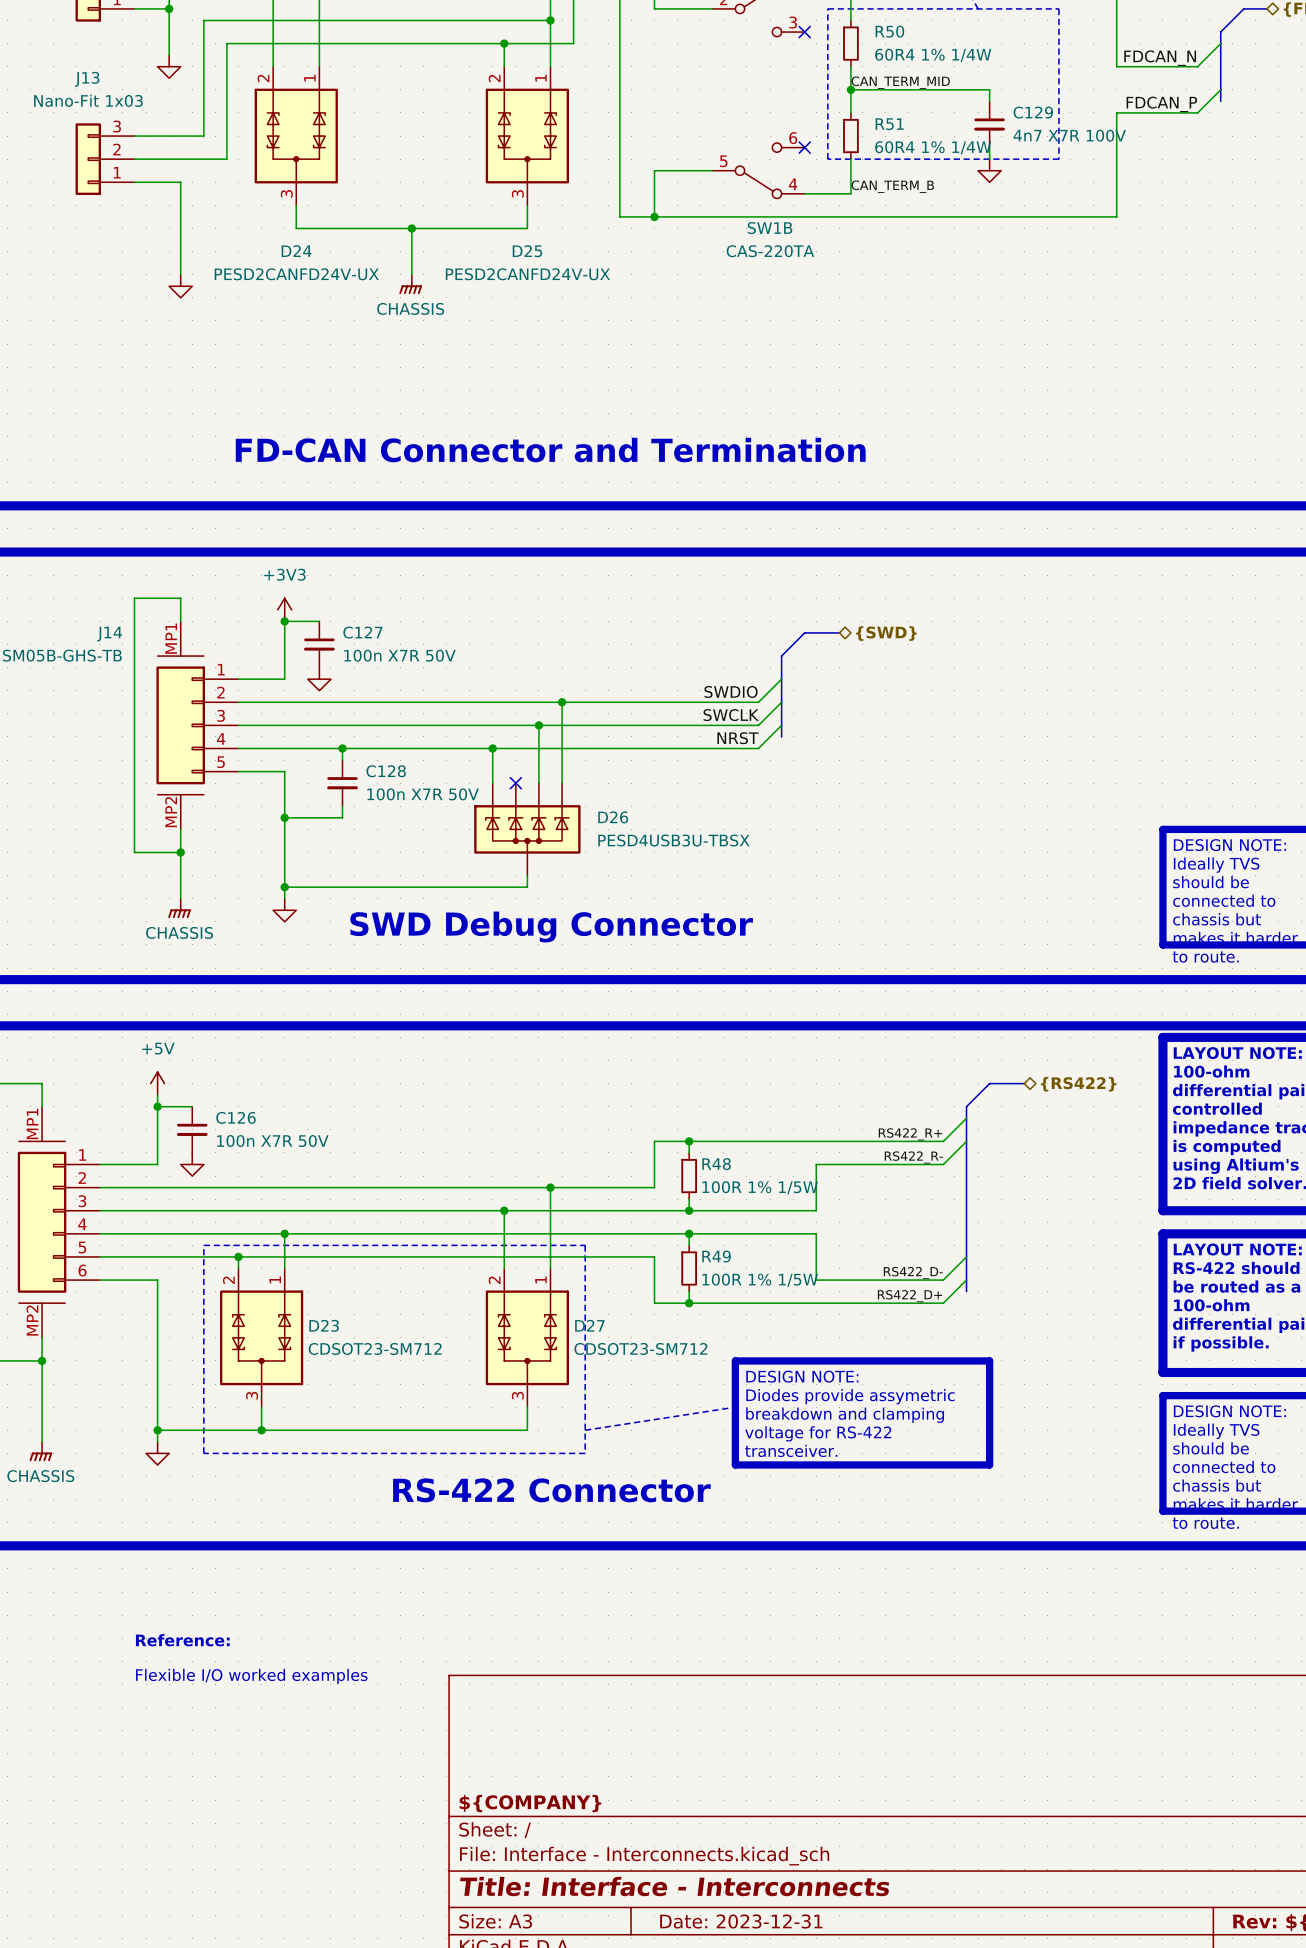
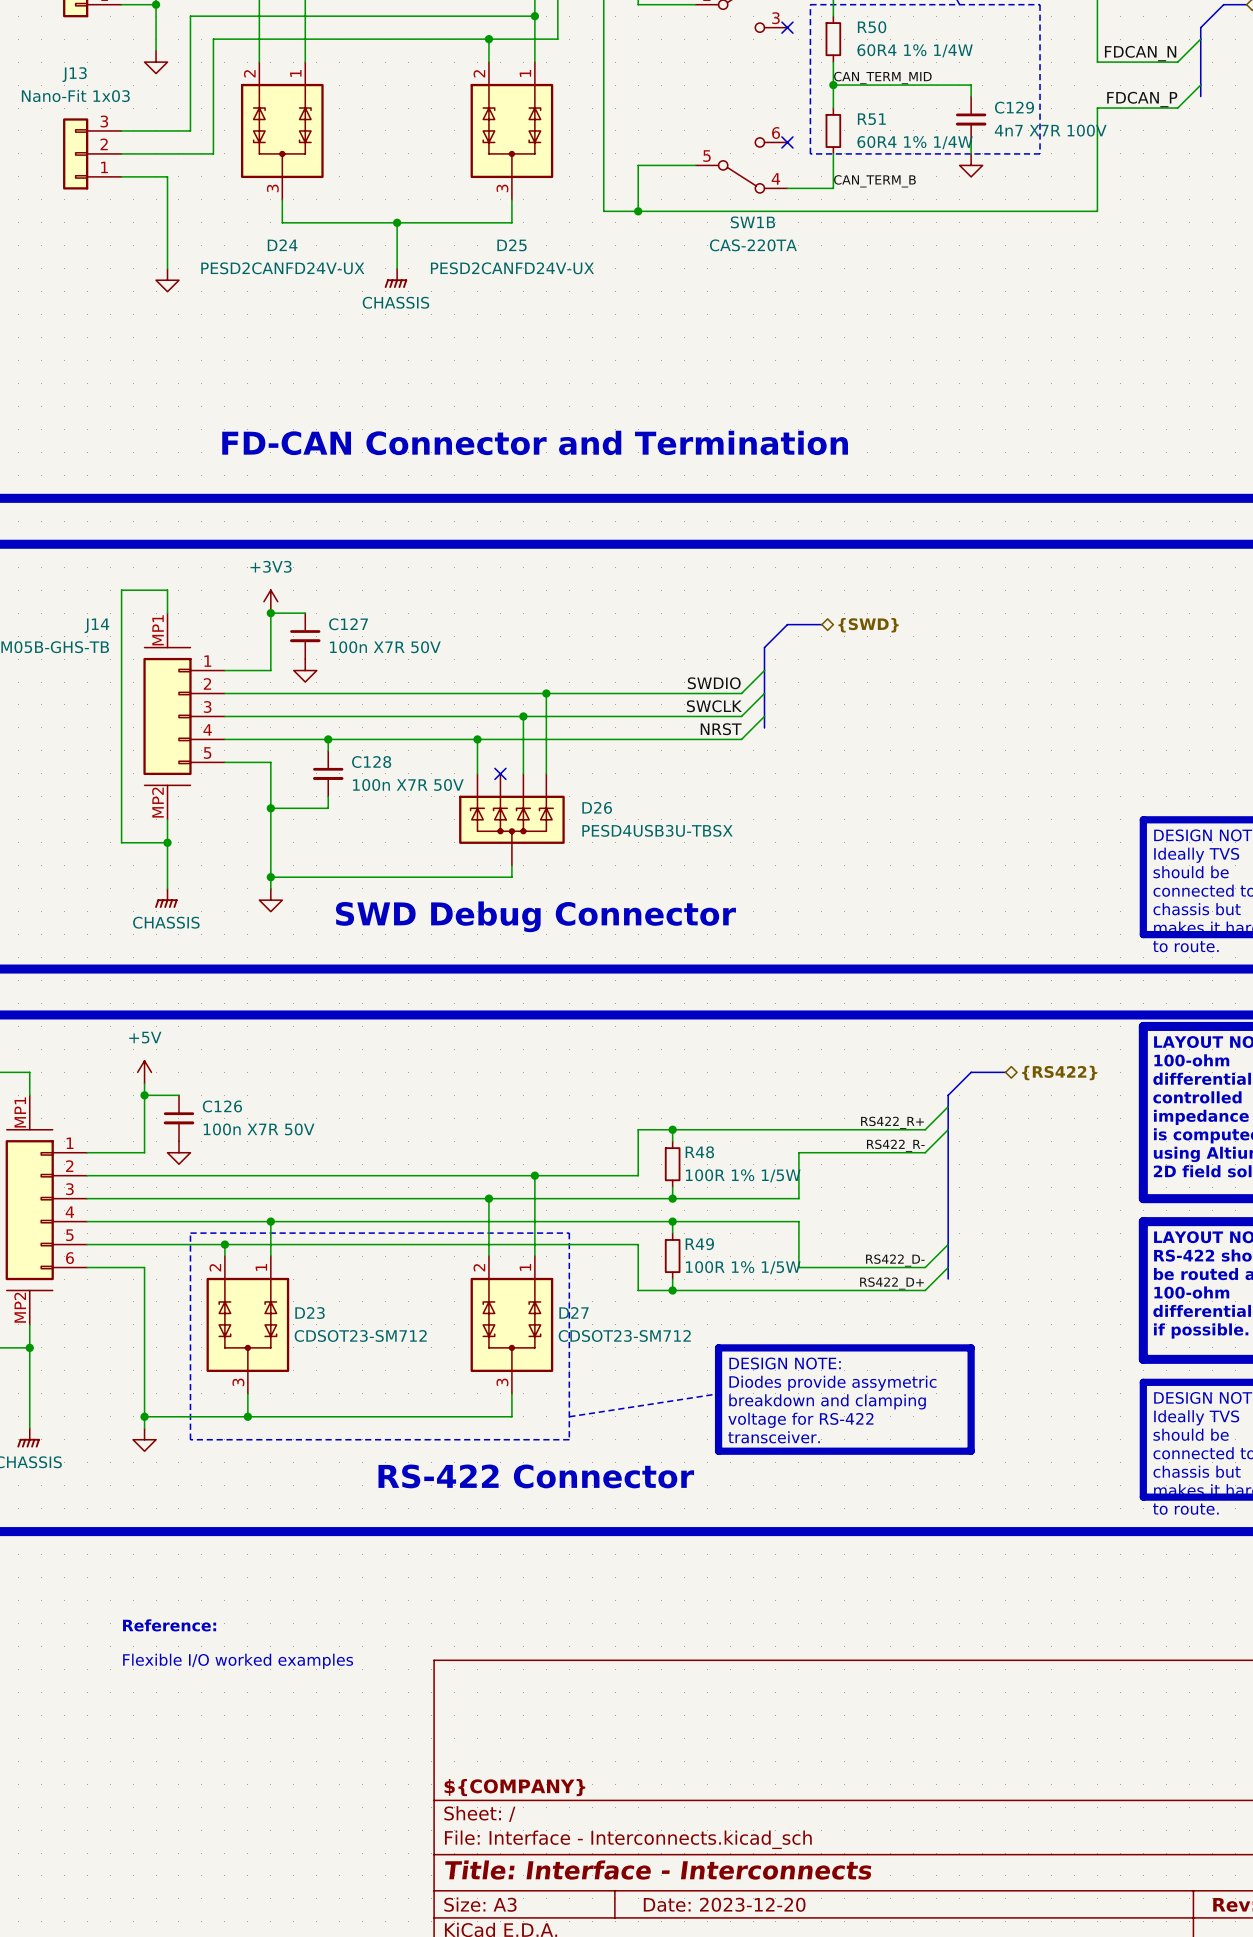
title block: Date: 2023-12-31 (741, 1921) -> Date: 2023-12-20 (724, 1904)

